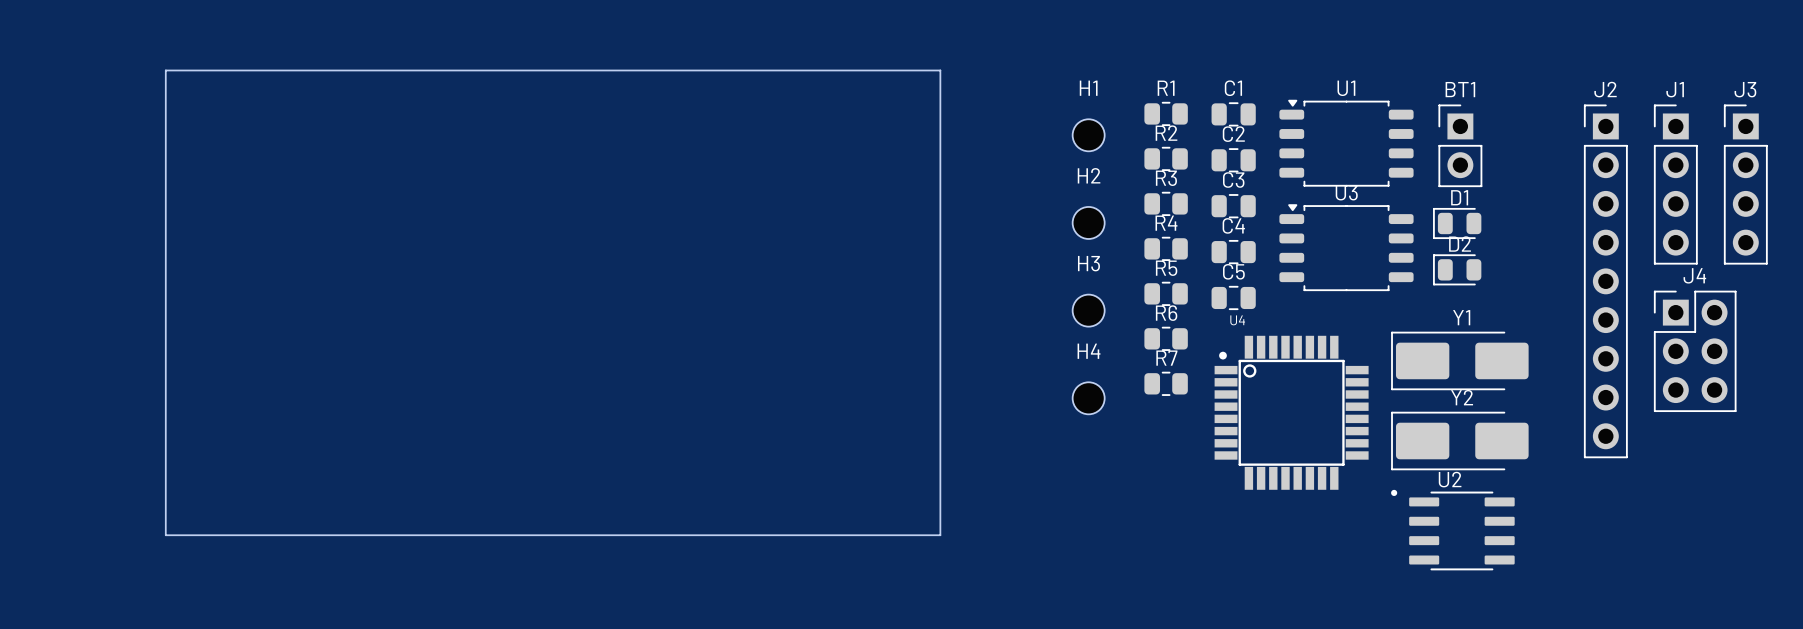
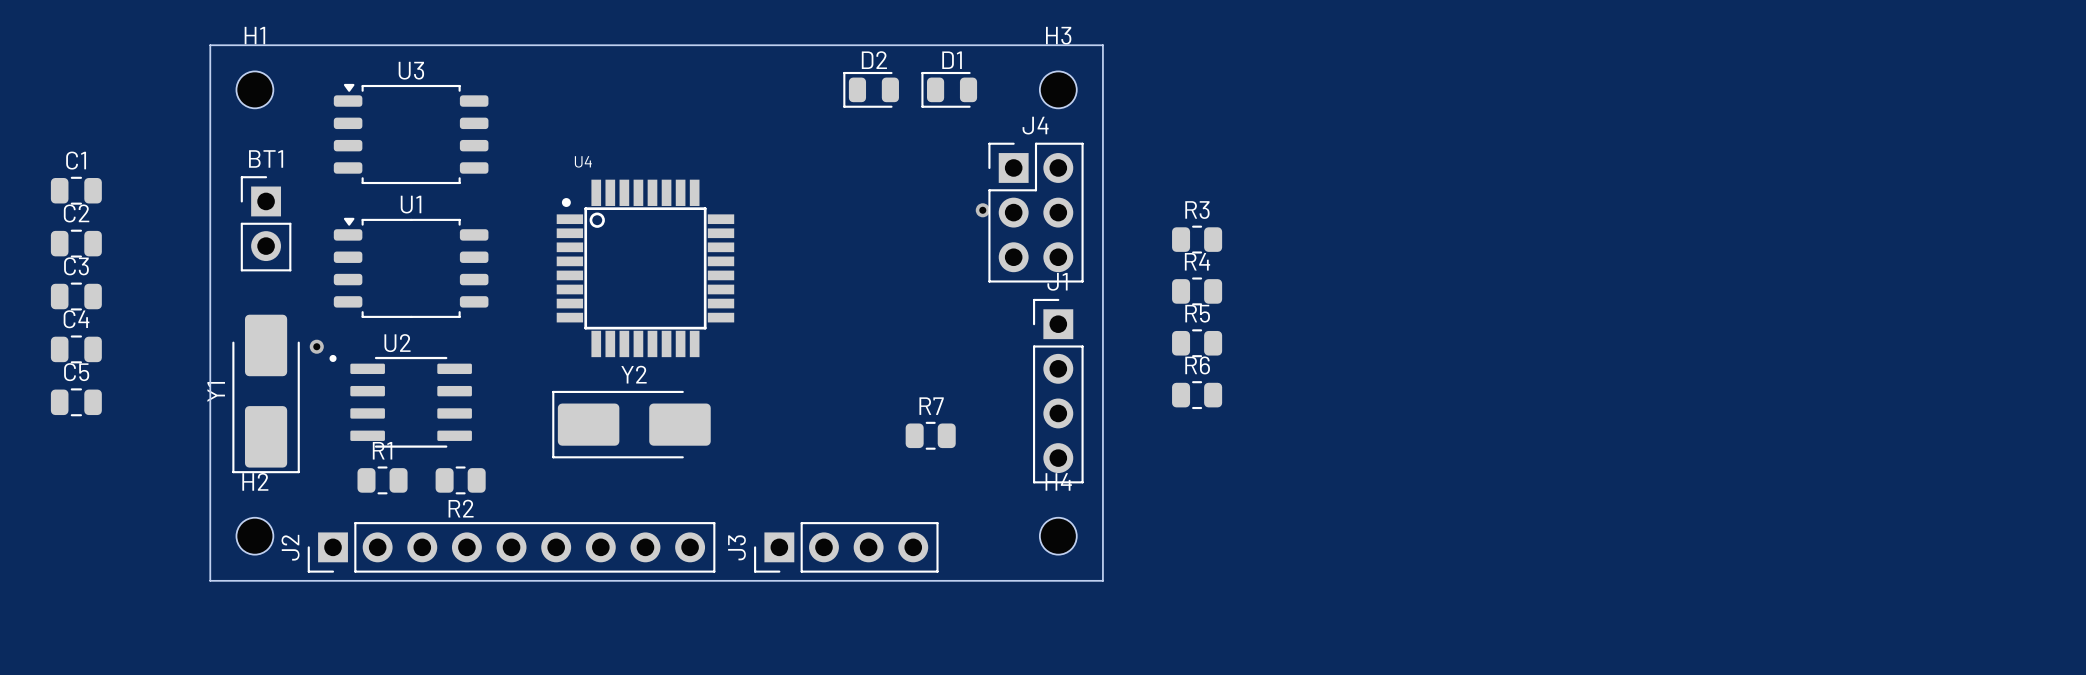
R1 position: (1166, 113) -> (382, 480)
C1 position: (1233, 114) -> (76, 190)
R2 name position: R2 (1166, 133) -> R2 (461, 508)
H1 position: (1088, 135) -> (254, 89)
U1 position: (1346, 143) -> (411, 267)
BT1 position: (1460, 145) -> (266, 223)
R2 position: (1166, 158) -> (460, 480)
C2 position: (1233, 160) -> (76, 243)
J1 position: (1675, 184) -> (1058, 391)
J3 rotation: 0° (1745, 184) -> 90° counterclockwise (846, 547)
J3 position: (1745, 184) -> (846, 547)
R3 position: (1166, 203) -> (1197, 239)
C3 position: (1233, 206) -> (76, 296)
via: none -> (982, 210)
H2 position: (1088, 222) -> (254, 536)
D1 position: (1457, 223) -> (949, 89)
U3 position: (1346, 247) -> (411, 133)
R4 position: (1166, 248) -> (1197, 291)
C4 position: (1233, 252) -> (76, 349)
D2 position: (1457, 269) -> (871, 89)
J2 rotation: 0° (1605, 281) -> 90° counterclockwise (511, 547)
J2 position: (1605, 281) -> (511, 547)
R5 position: (1166, 293) -> (1197, 343)
C5 position: (1233, 297) -> (76, 402)
H3 position: (1088, 310) -> (1058, 89)
via: none -> (316, 346)
R6 position: (1166, 338) -> (1197, 395)
J4 position: (1695, 351) -> (1035, 212)
Y1 rotation: 0° (1459, 360) -> 90° counterclockwise (266, 393)
Y1 position: (1459, 360) -> (266, 393)
R7 position: (1166, 383) -> (930, 435)
H4 position: (1088, 398) -> (1058, 536)
U4 position: (1291, 412) -> (645, 268)
Y2 position: (1459, 441) -> (631, 424)
U2 position: (1452, 530) -> (400, 401)

